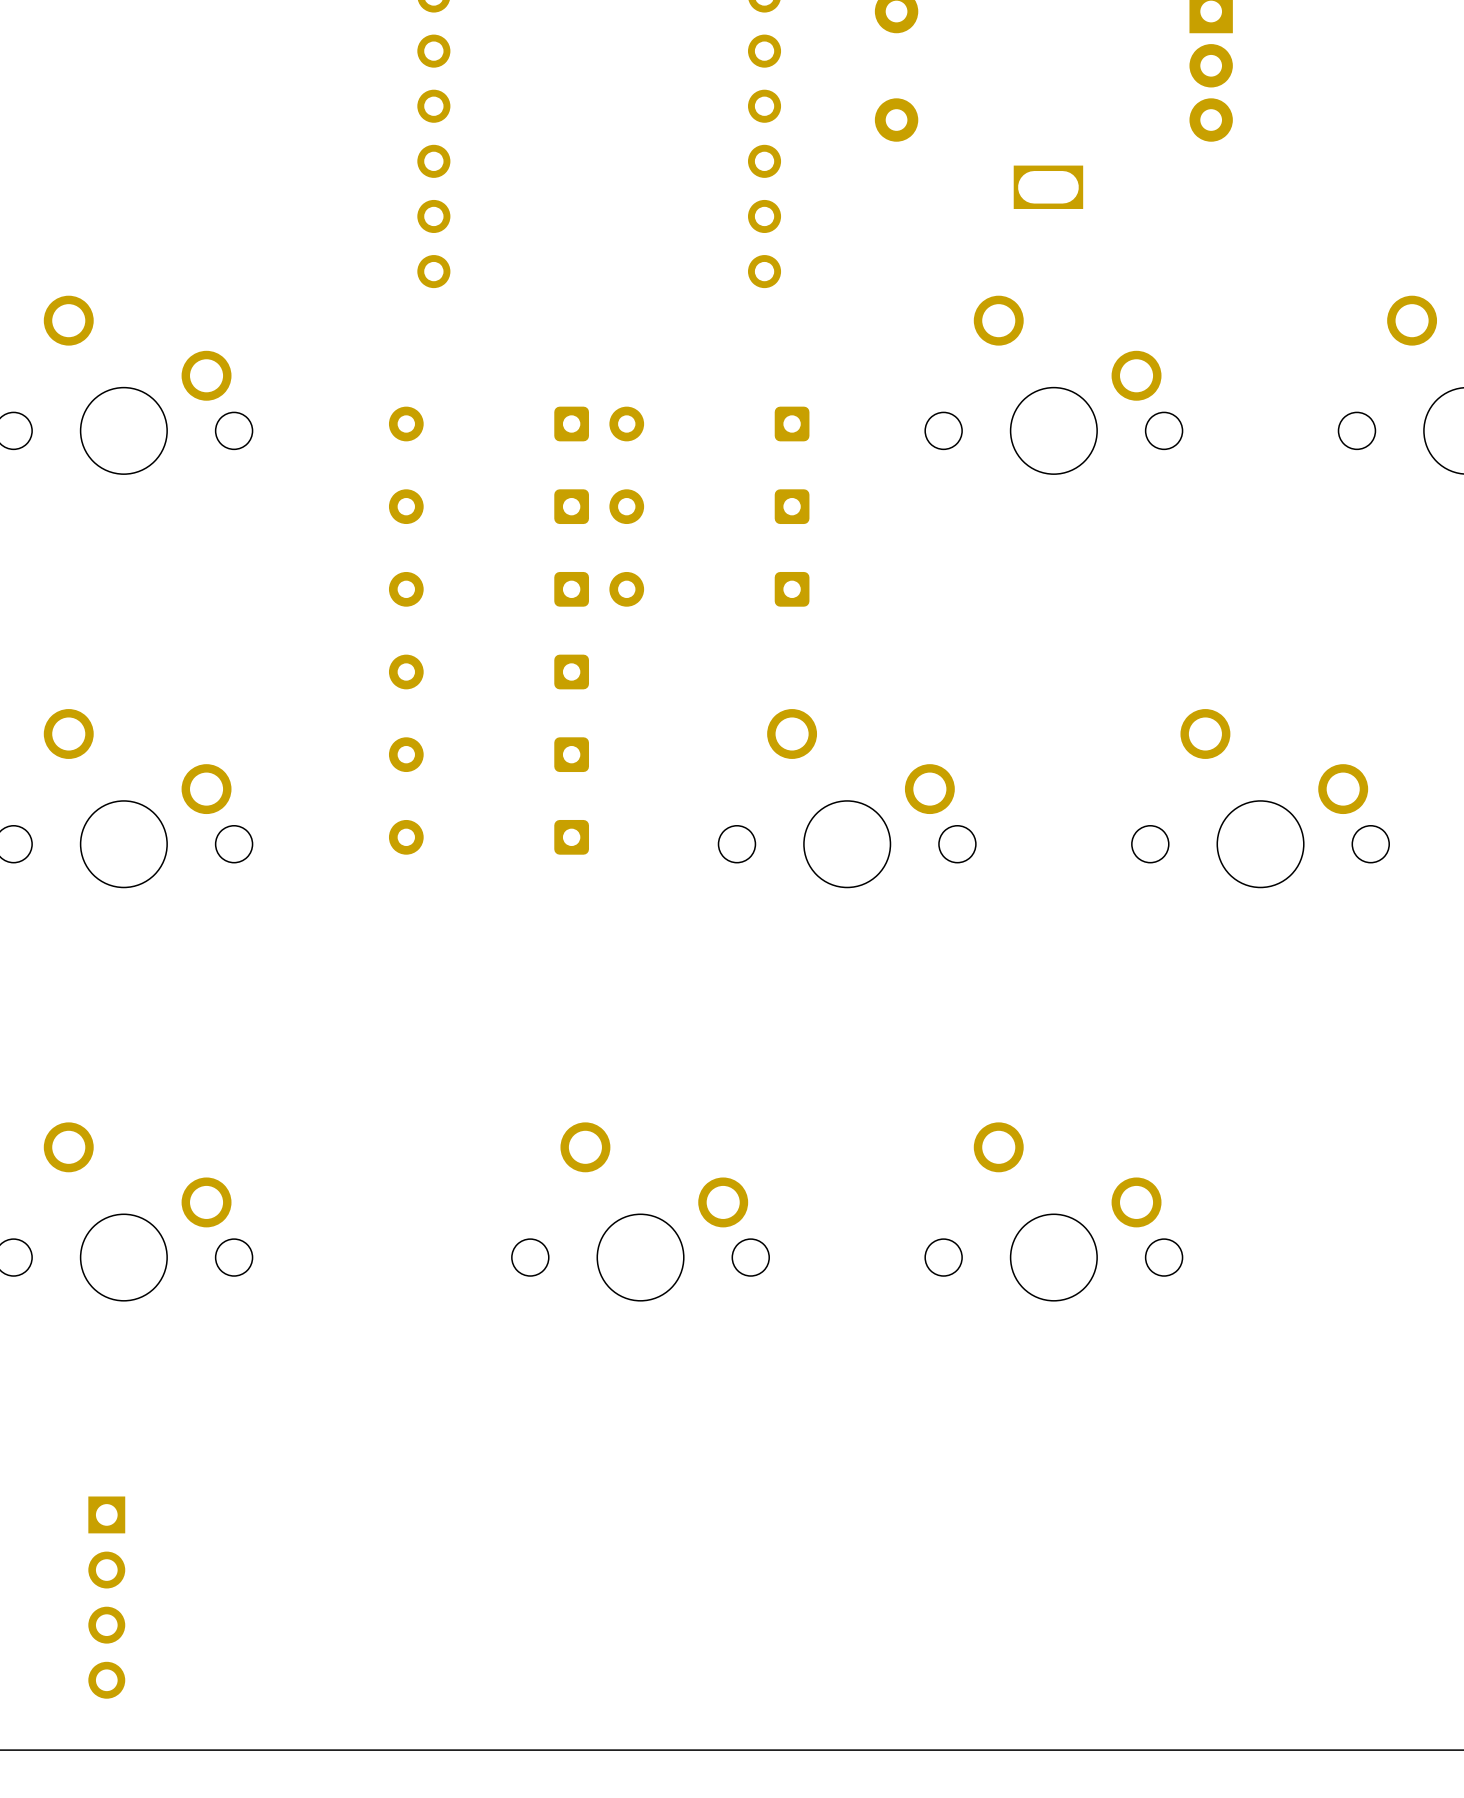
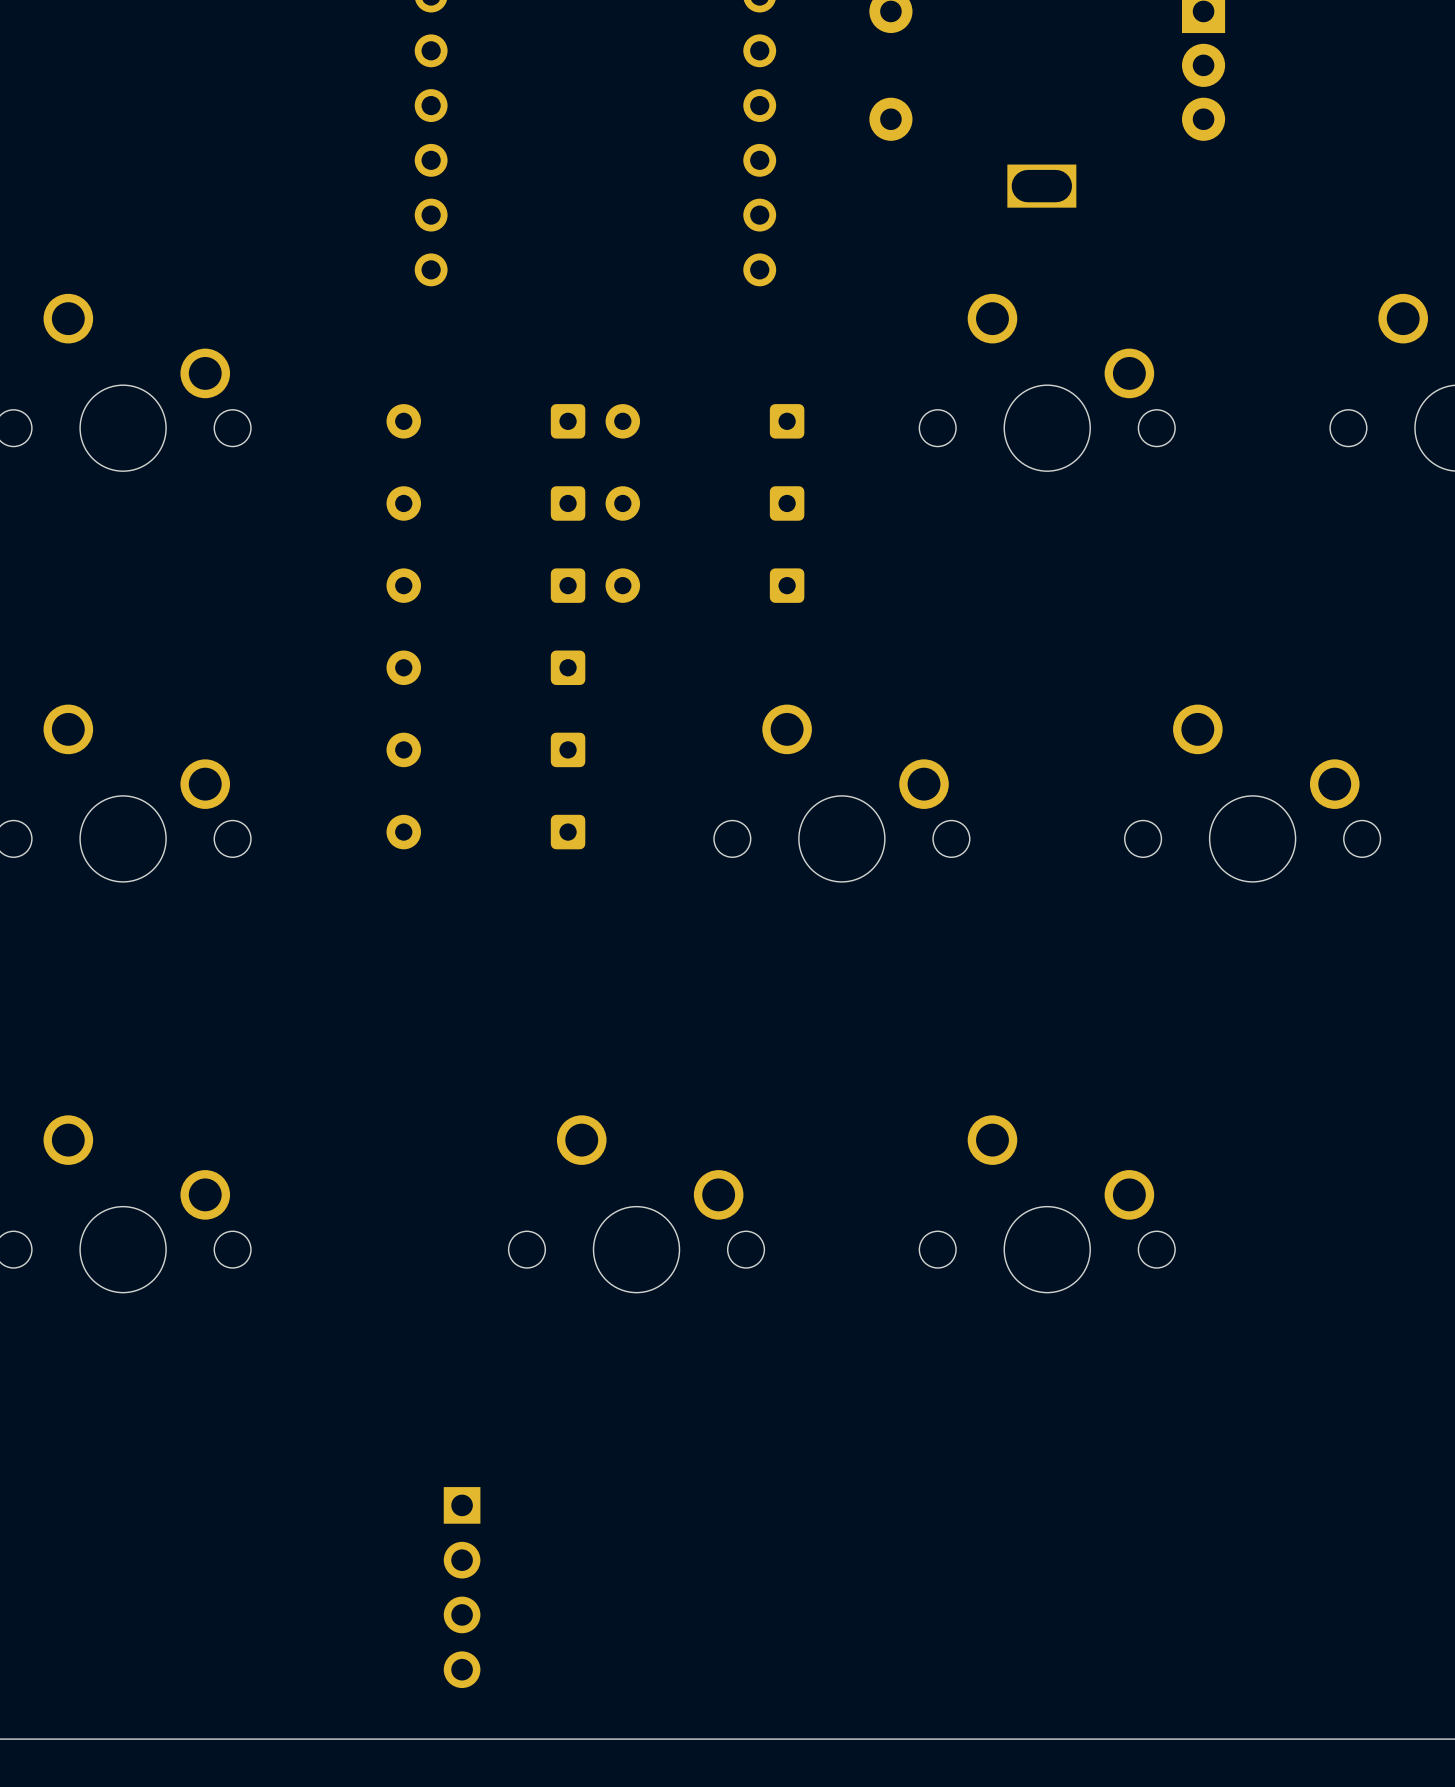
part position: (106, 1597) -> (462, 1587)

